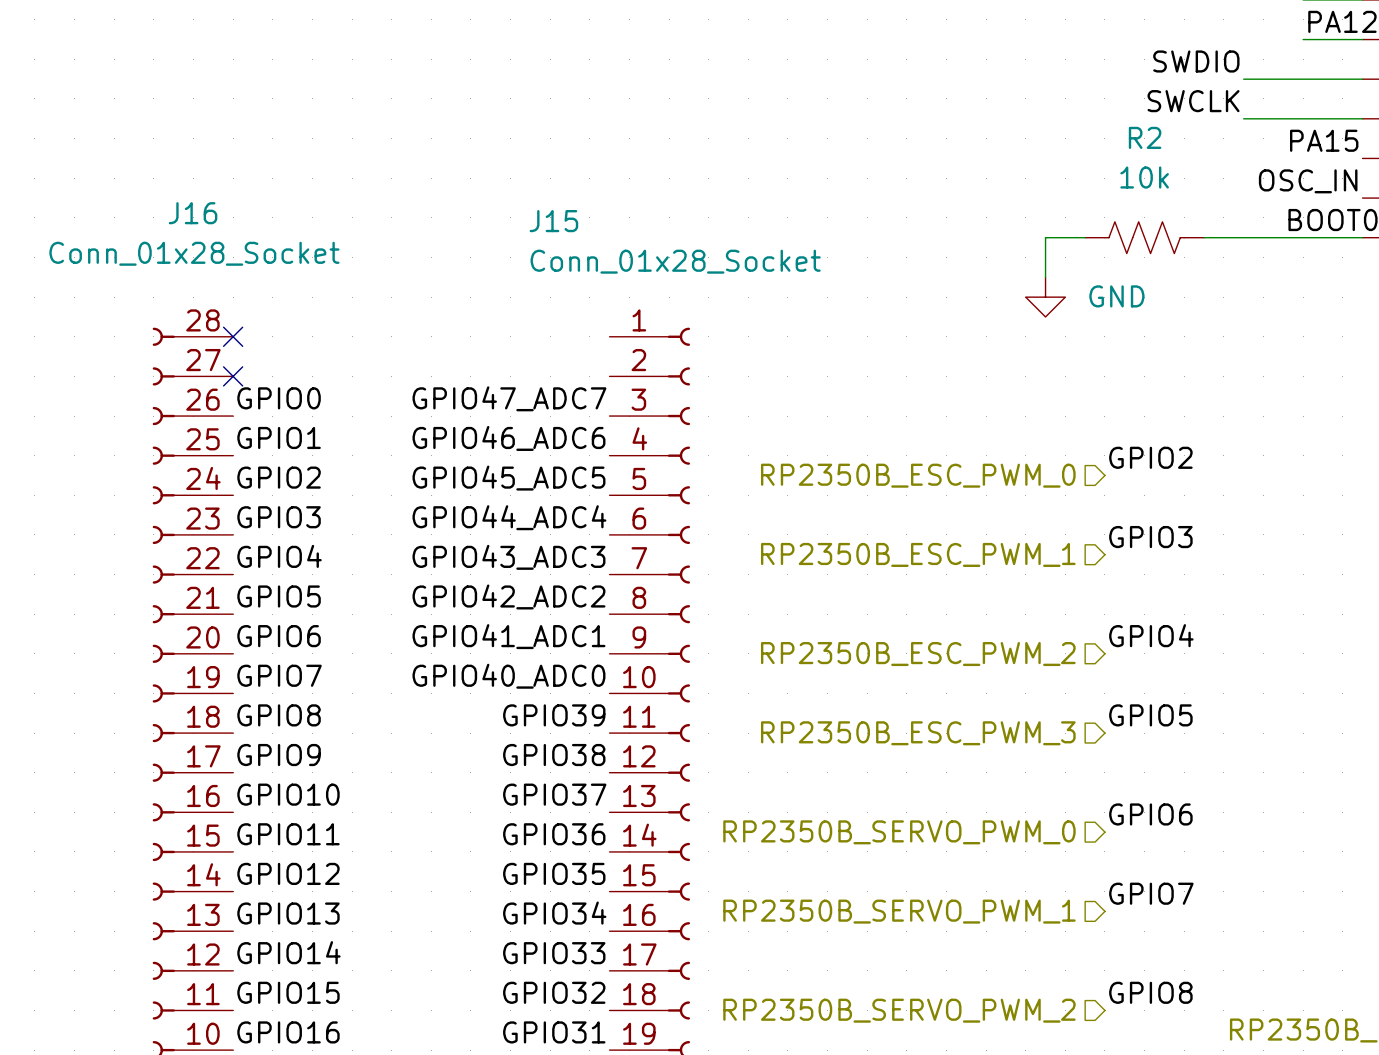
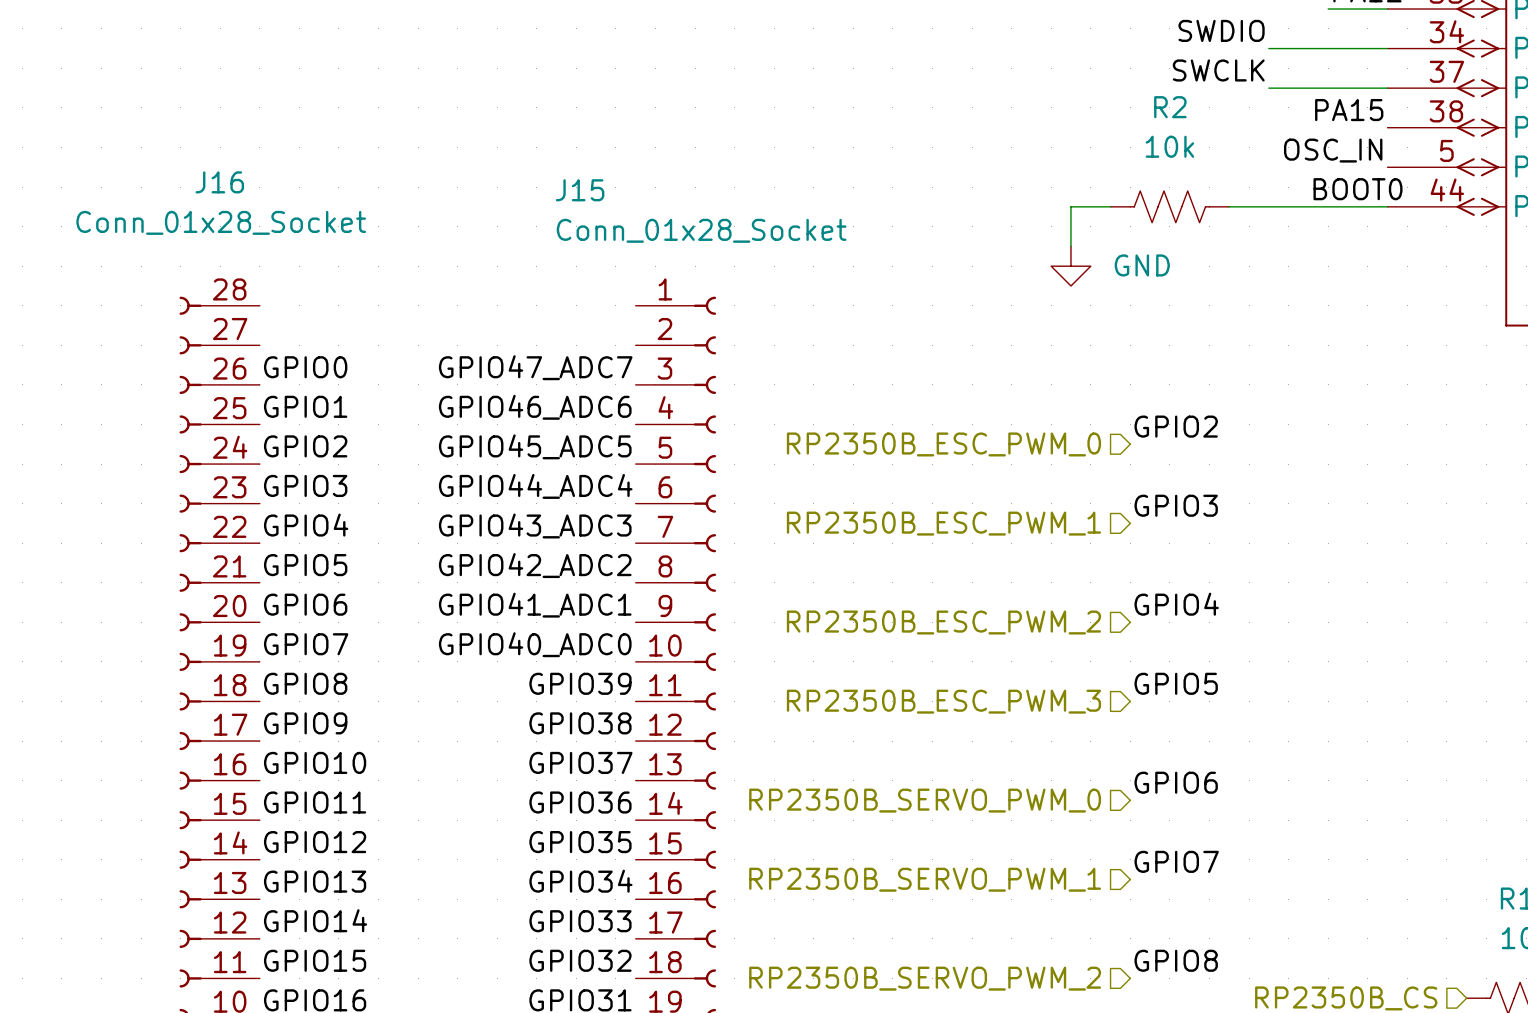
no-connect mark: (233, 336) -> none
no-connect mark: (233, 376) -> none

